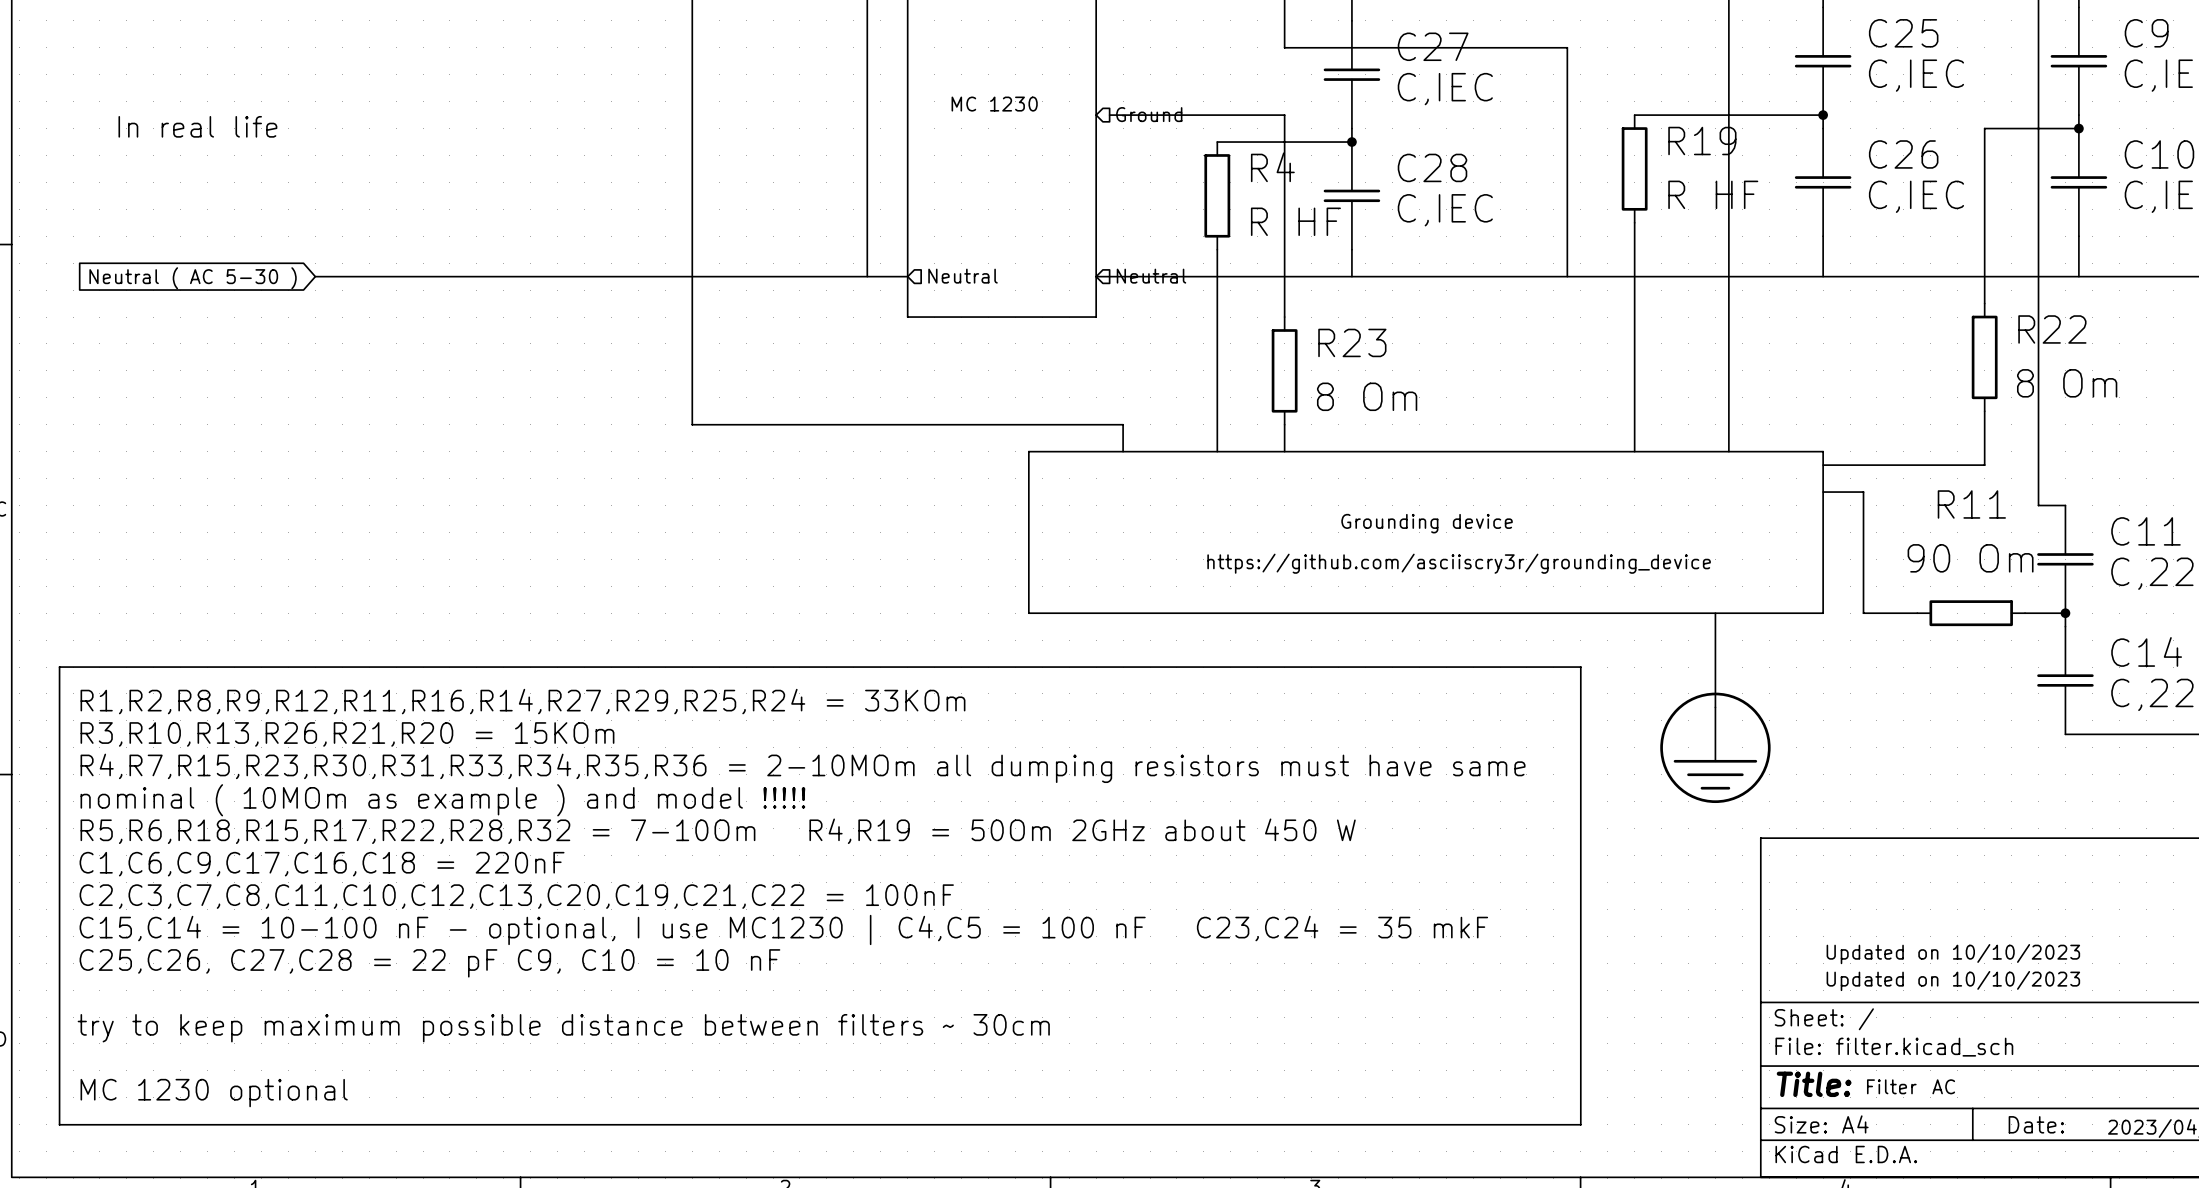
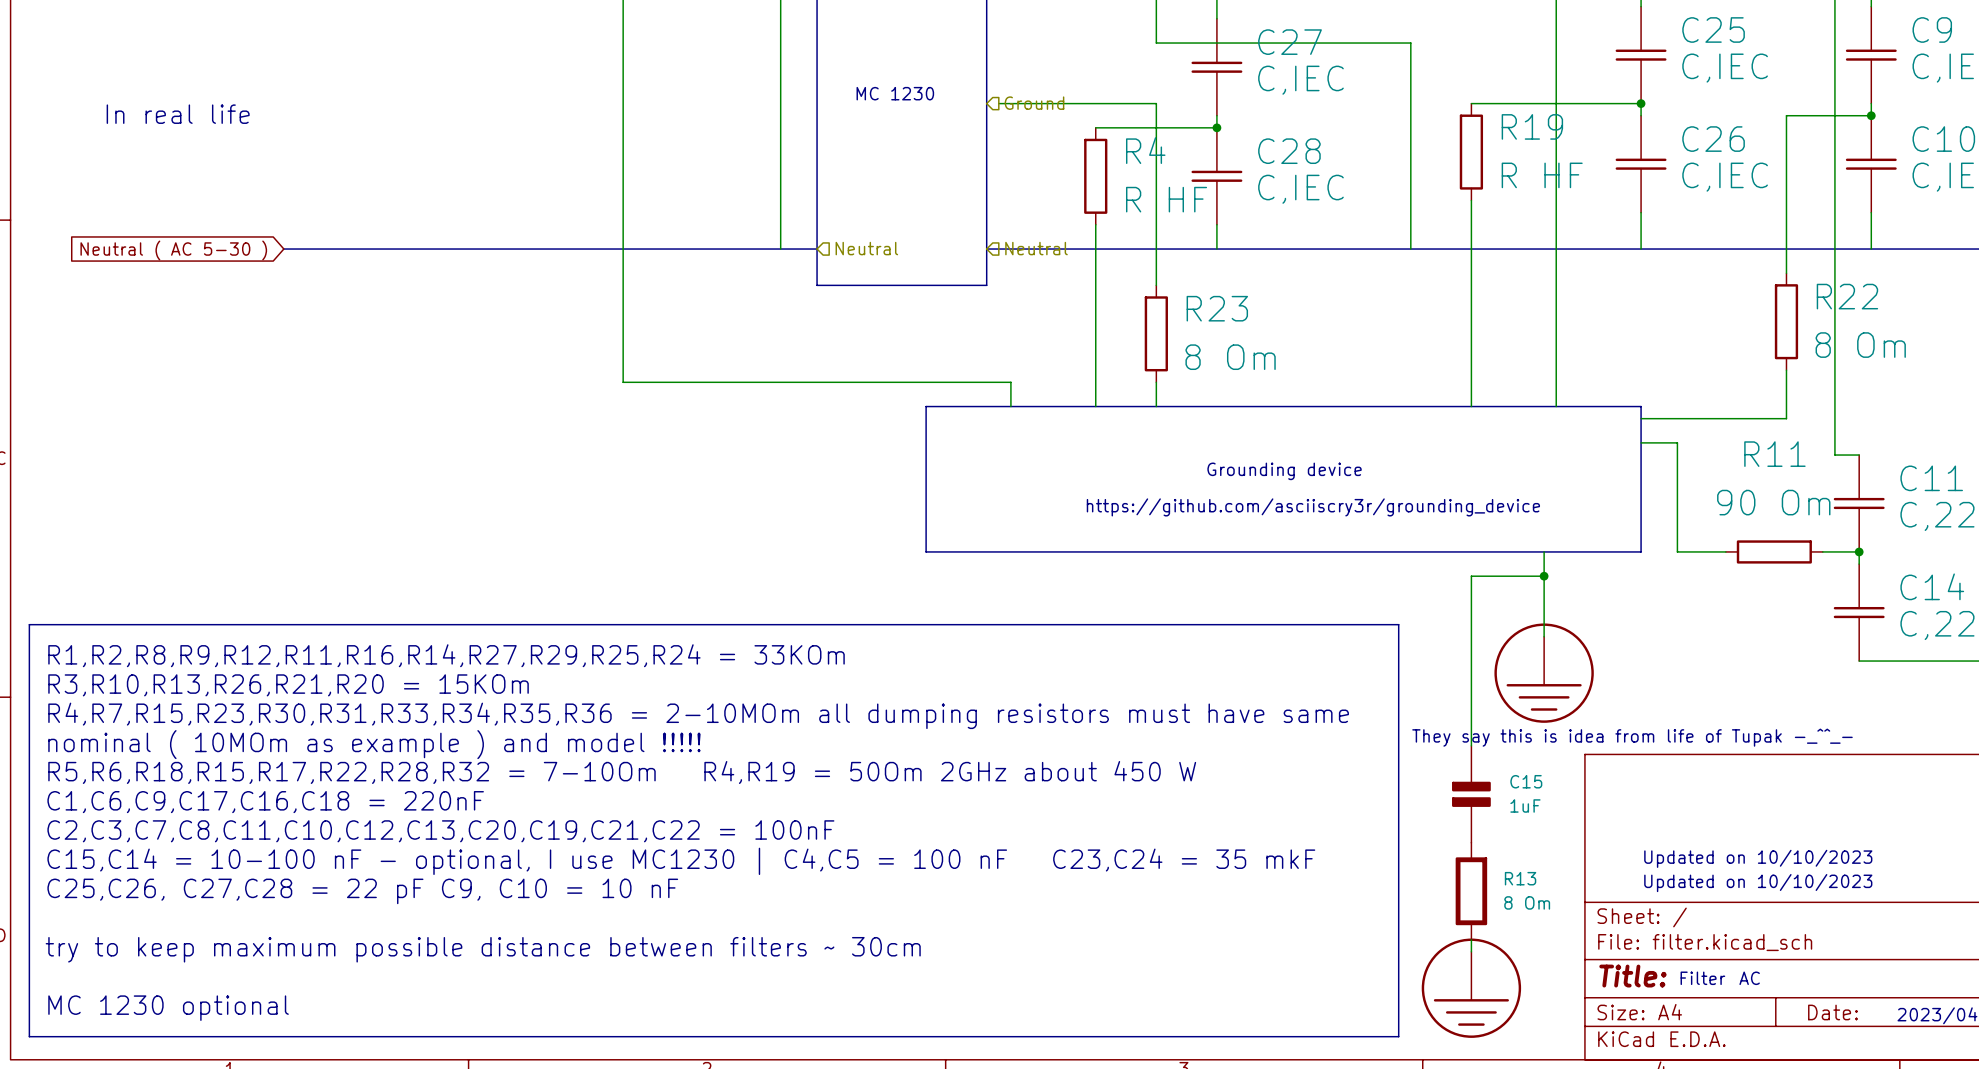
wire: none -> (1544, 576) (1471, 576) (1471, 745)
junction: none -> (1544, 576)
line: (59, 667) (1580, 667) (1580, 1124) (59, 1124) (59, 667) -> (29, 624) (1398, 624) (1398, 1036) (29, 1036) (29, 624)
text position: R1,R2,R8,R9,R12,R11,R16,R14,R27,R29,R25,R24 = 33KOm (522, 701) -> R1,R2,R8,R9,R12,R11,R16,R14,R27,R29,R25,R24 = 33KOm (446, 655)
text position: R3,R10,R13,R26,R21,R20 = 15KOm (347, 734) -> R3,R10,R13,R26,R21,R20 = 15KOm (288, 685)
text position: R4,R7,R15,R23,R30,R31,R33,R34,R35,R36 = 2-10MOm all dumping resistors must have same (803, 768) -> R4,R7,R15,R23,R30,R31,R33,R34,R35,R36 = 2-10MOm all dumping resistors must have same (698, 715)
text position: nominal ( 10MOm as example ) and model !!!!! (442, 800) -> nominal ( 10MOm as example ) and model !!!!! (374, 744)
text: none -> They say this is idea from life of Tupak -_^^_- (1632, 737)
text position: R5,R6,R18,R15,R17,R22,R28,R32 = 7-10Om R4,R19 = 50Om 2GHz about 450 W (718, 831) -> R5,R6,R18,R15,R17,R22,R28,R32 = 7-10Om R4,R19 = 50Om 2GHz about 450 W (622, 772)
text position: C1,C6,C9,C17,C16,C18 = 220nF (322, 864) -> C1,C6,C9,C17,C16,C18 = 220nF (265, 802)
C15: none -> 1uF (1471, 794)
text position: C2,C3,C7,C8,C11,C10,C12,C13,C20,C19,C21,C22 = 100nF (516, 896) -> C2,C3,C7,C8,C11,C10,C12,C13,C20,C19,C21,C22 = 100nF (440, 831)
text position: C15,C14 = 10-100 nF - optional, I use MC1230 | C4,C5 = 100 nF C23,C24 = 35 mkF (783, 929) -> C15,C14 = 10-100 nF - optional, I use MC1230 | C4,C5 = 100 nF C23,C24 = 35 mkF (681, 861)
text position: C25,C26, C27,C28 = 22 pF C9, C10 = 10 nF (429, 963) -> C25,C26, C27,C28 = 22 pF C9, C10 = 10 nF (362, 891)
R13: none -> 8 Om (1471, 891)
text position: try to keep maximum possible distance between filters ~ 30cm (563, 1028) -> try to keep maximum possible distance between filters ~ 30cm (483, 949)
wire: none -> (1471, 939) (1471, 951)
text position: MC 1230 optional (214, 1093) -> MC 1230 optional (168, 1008)
power symbol: none -> (1471, 988)

